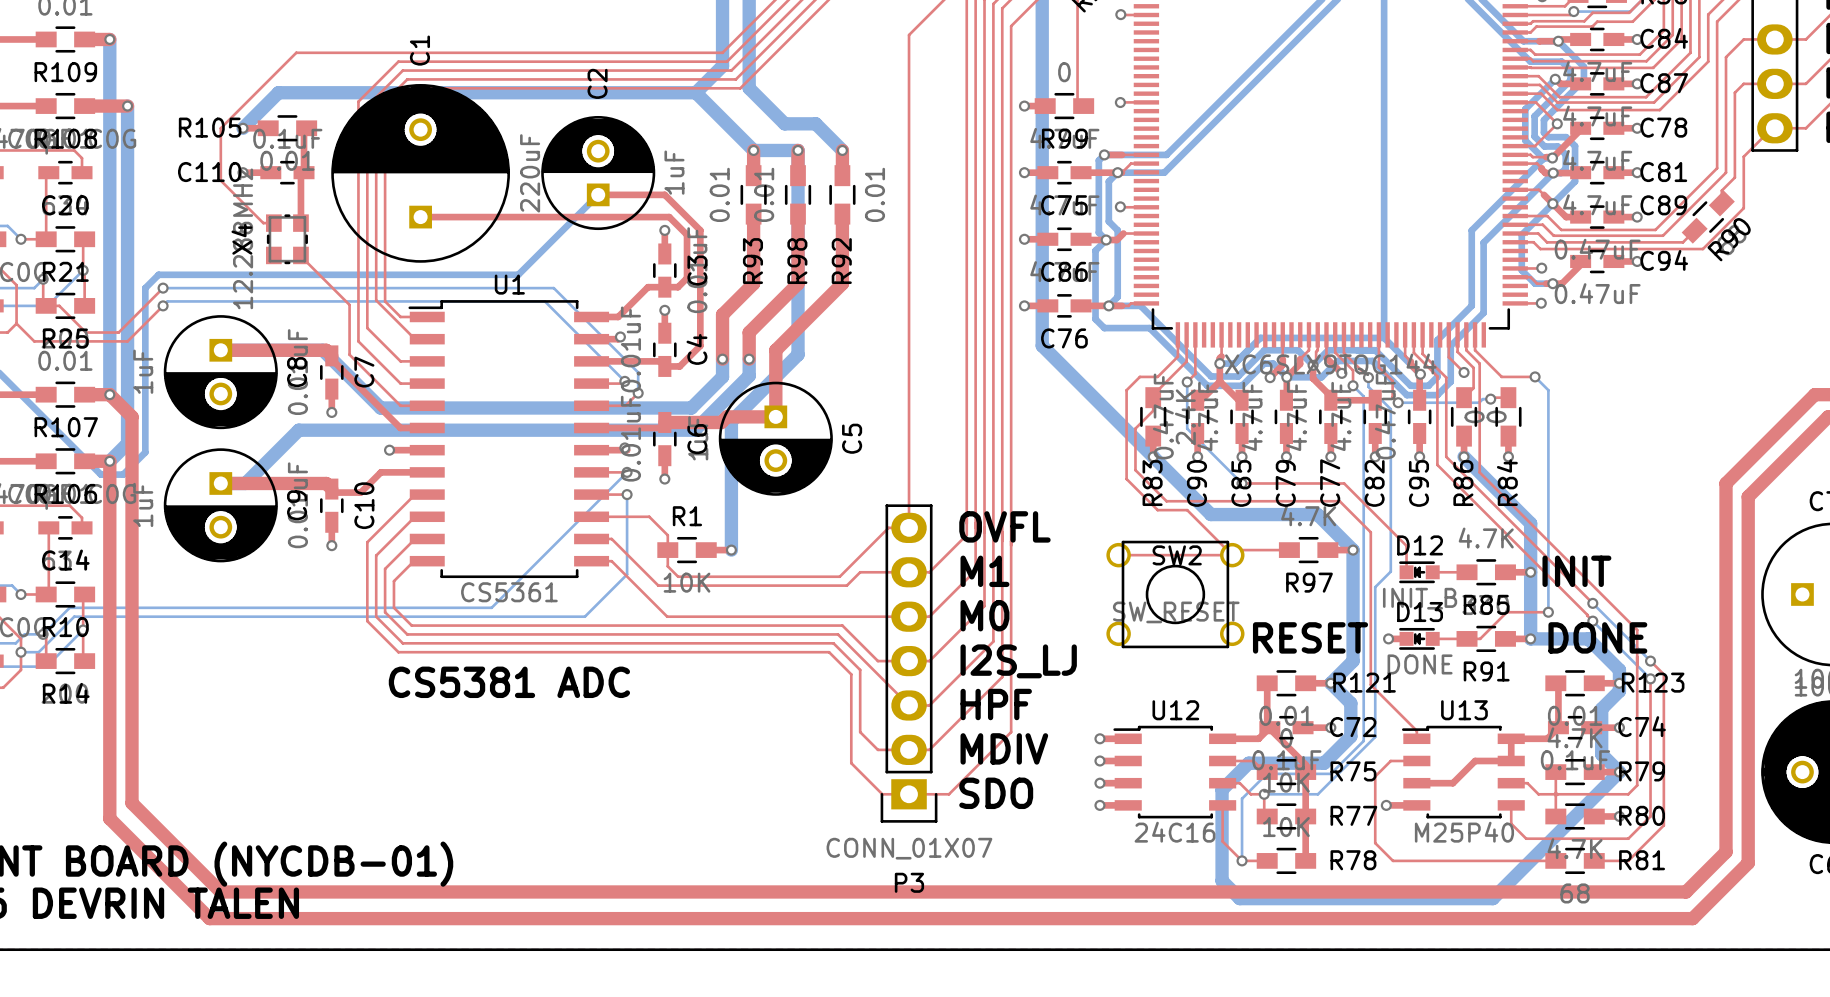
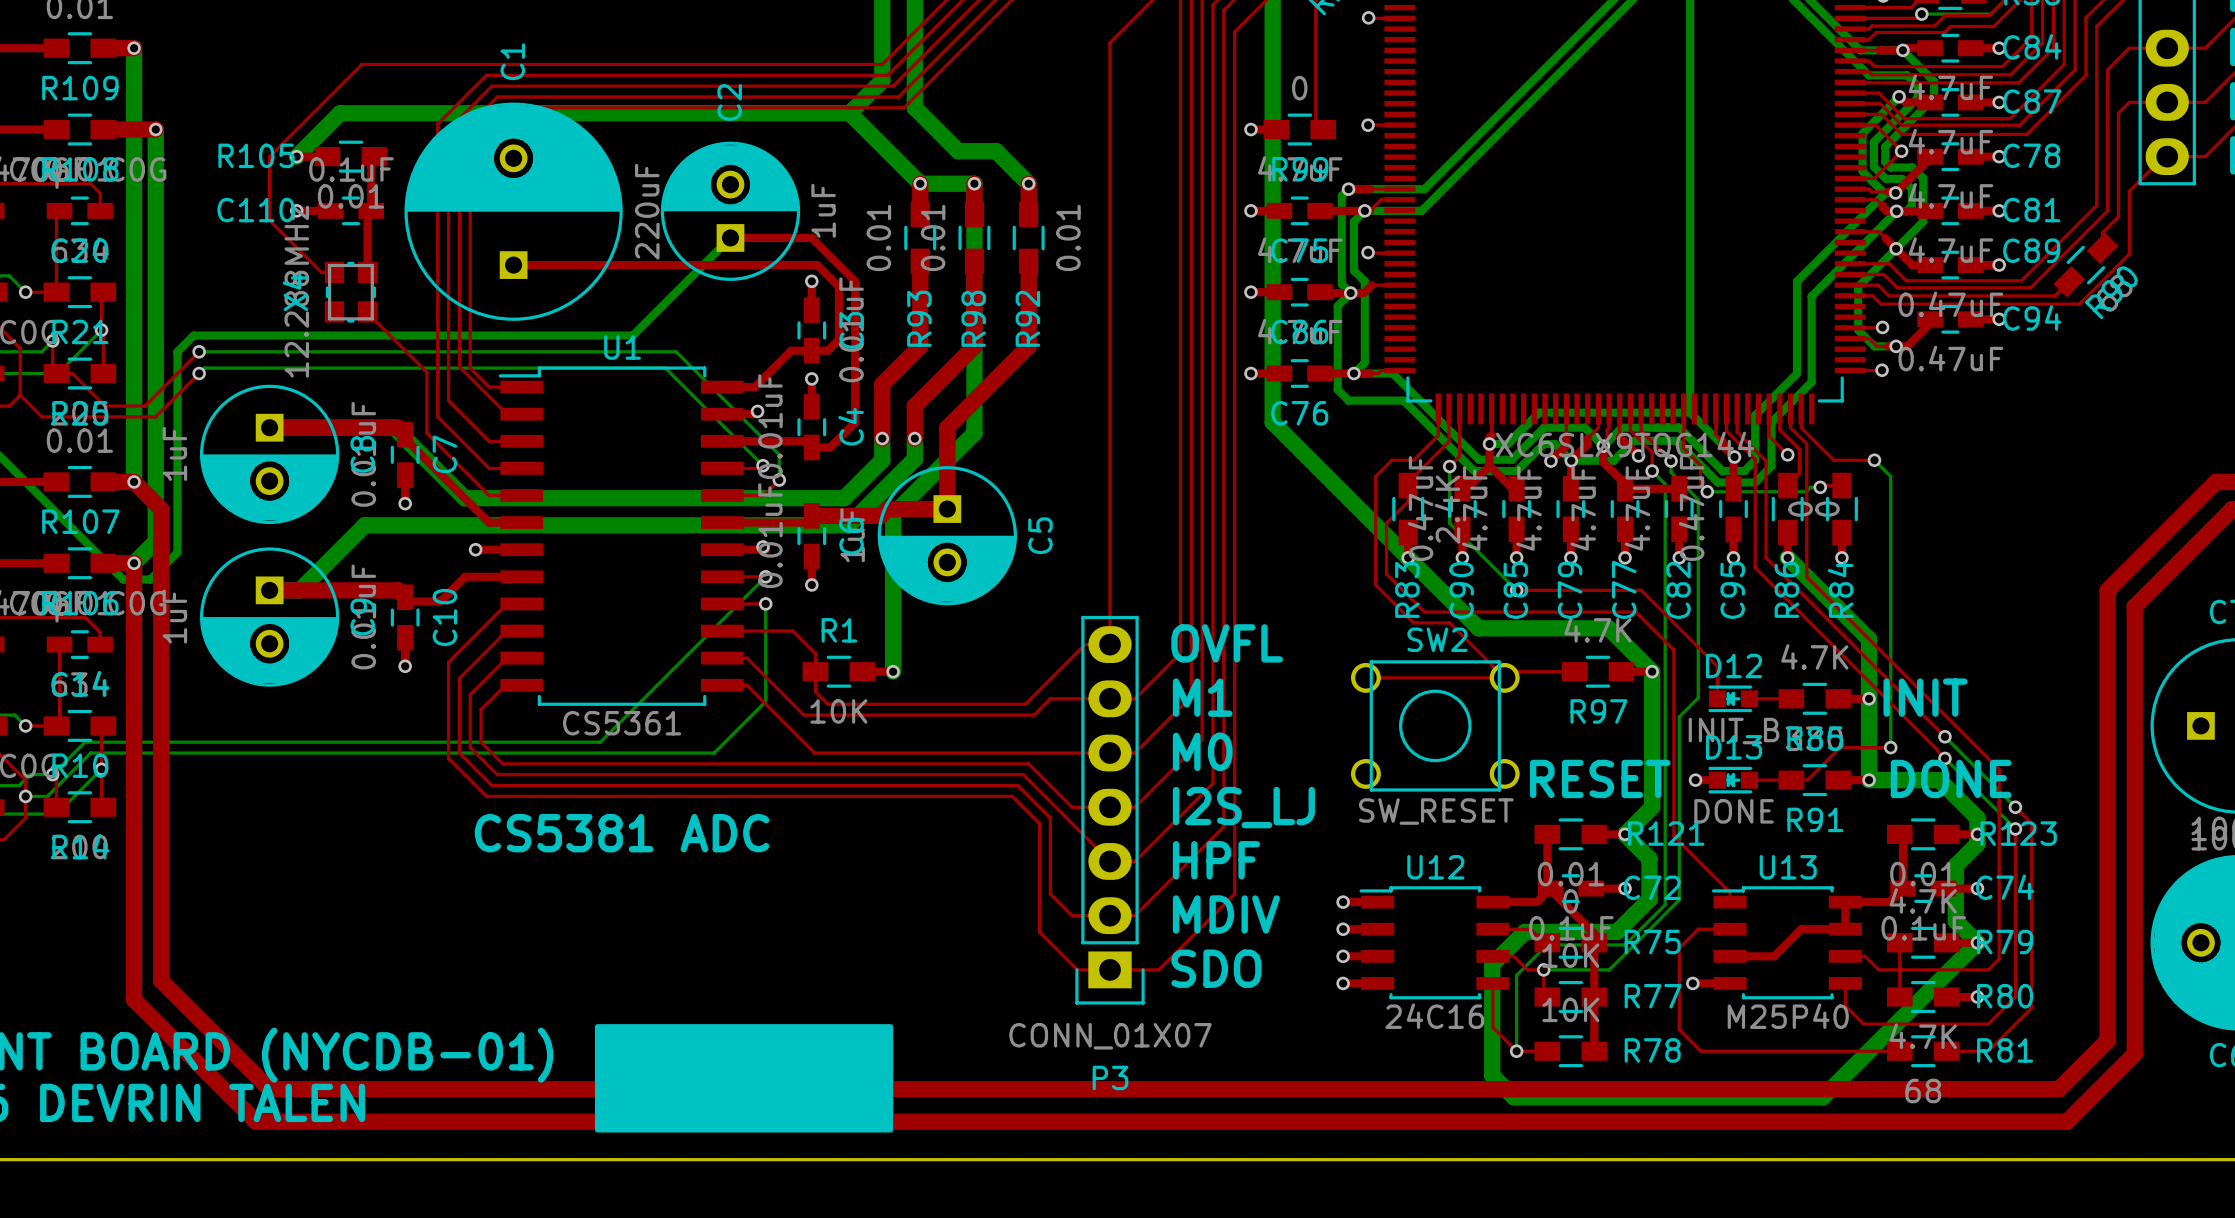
SW2 name position: SW2 (1177, 555) -> SW2 (1437, 639)
SW2 value position: SW_RESET (1176, 612) -> SW_RESET (1436, 811)
drawing: none -> [594, 1024, 894, 1133]

